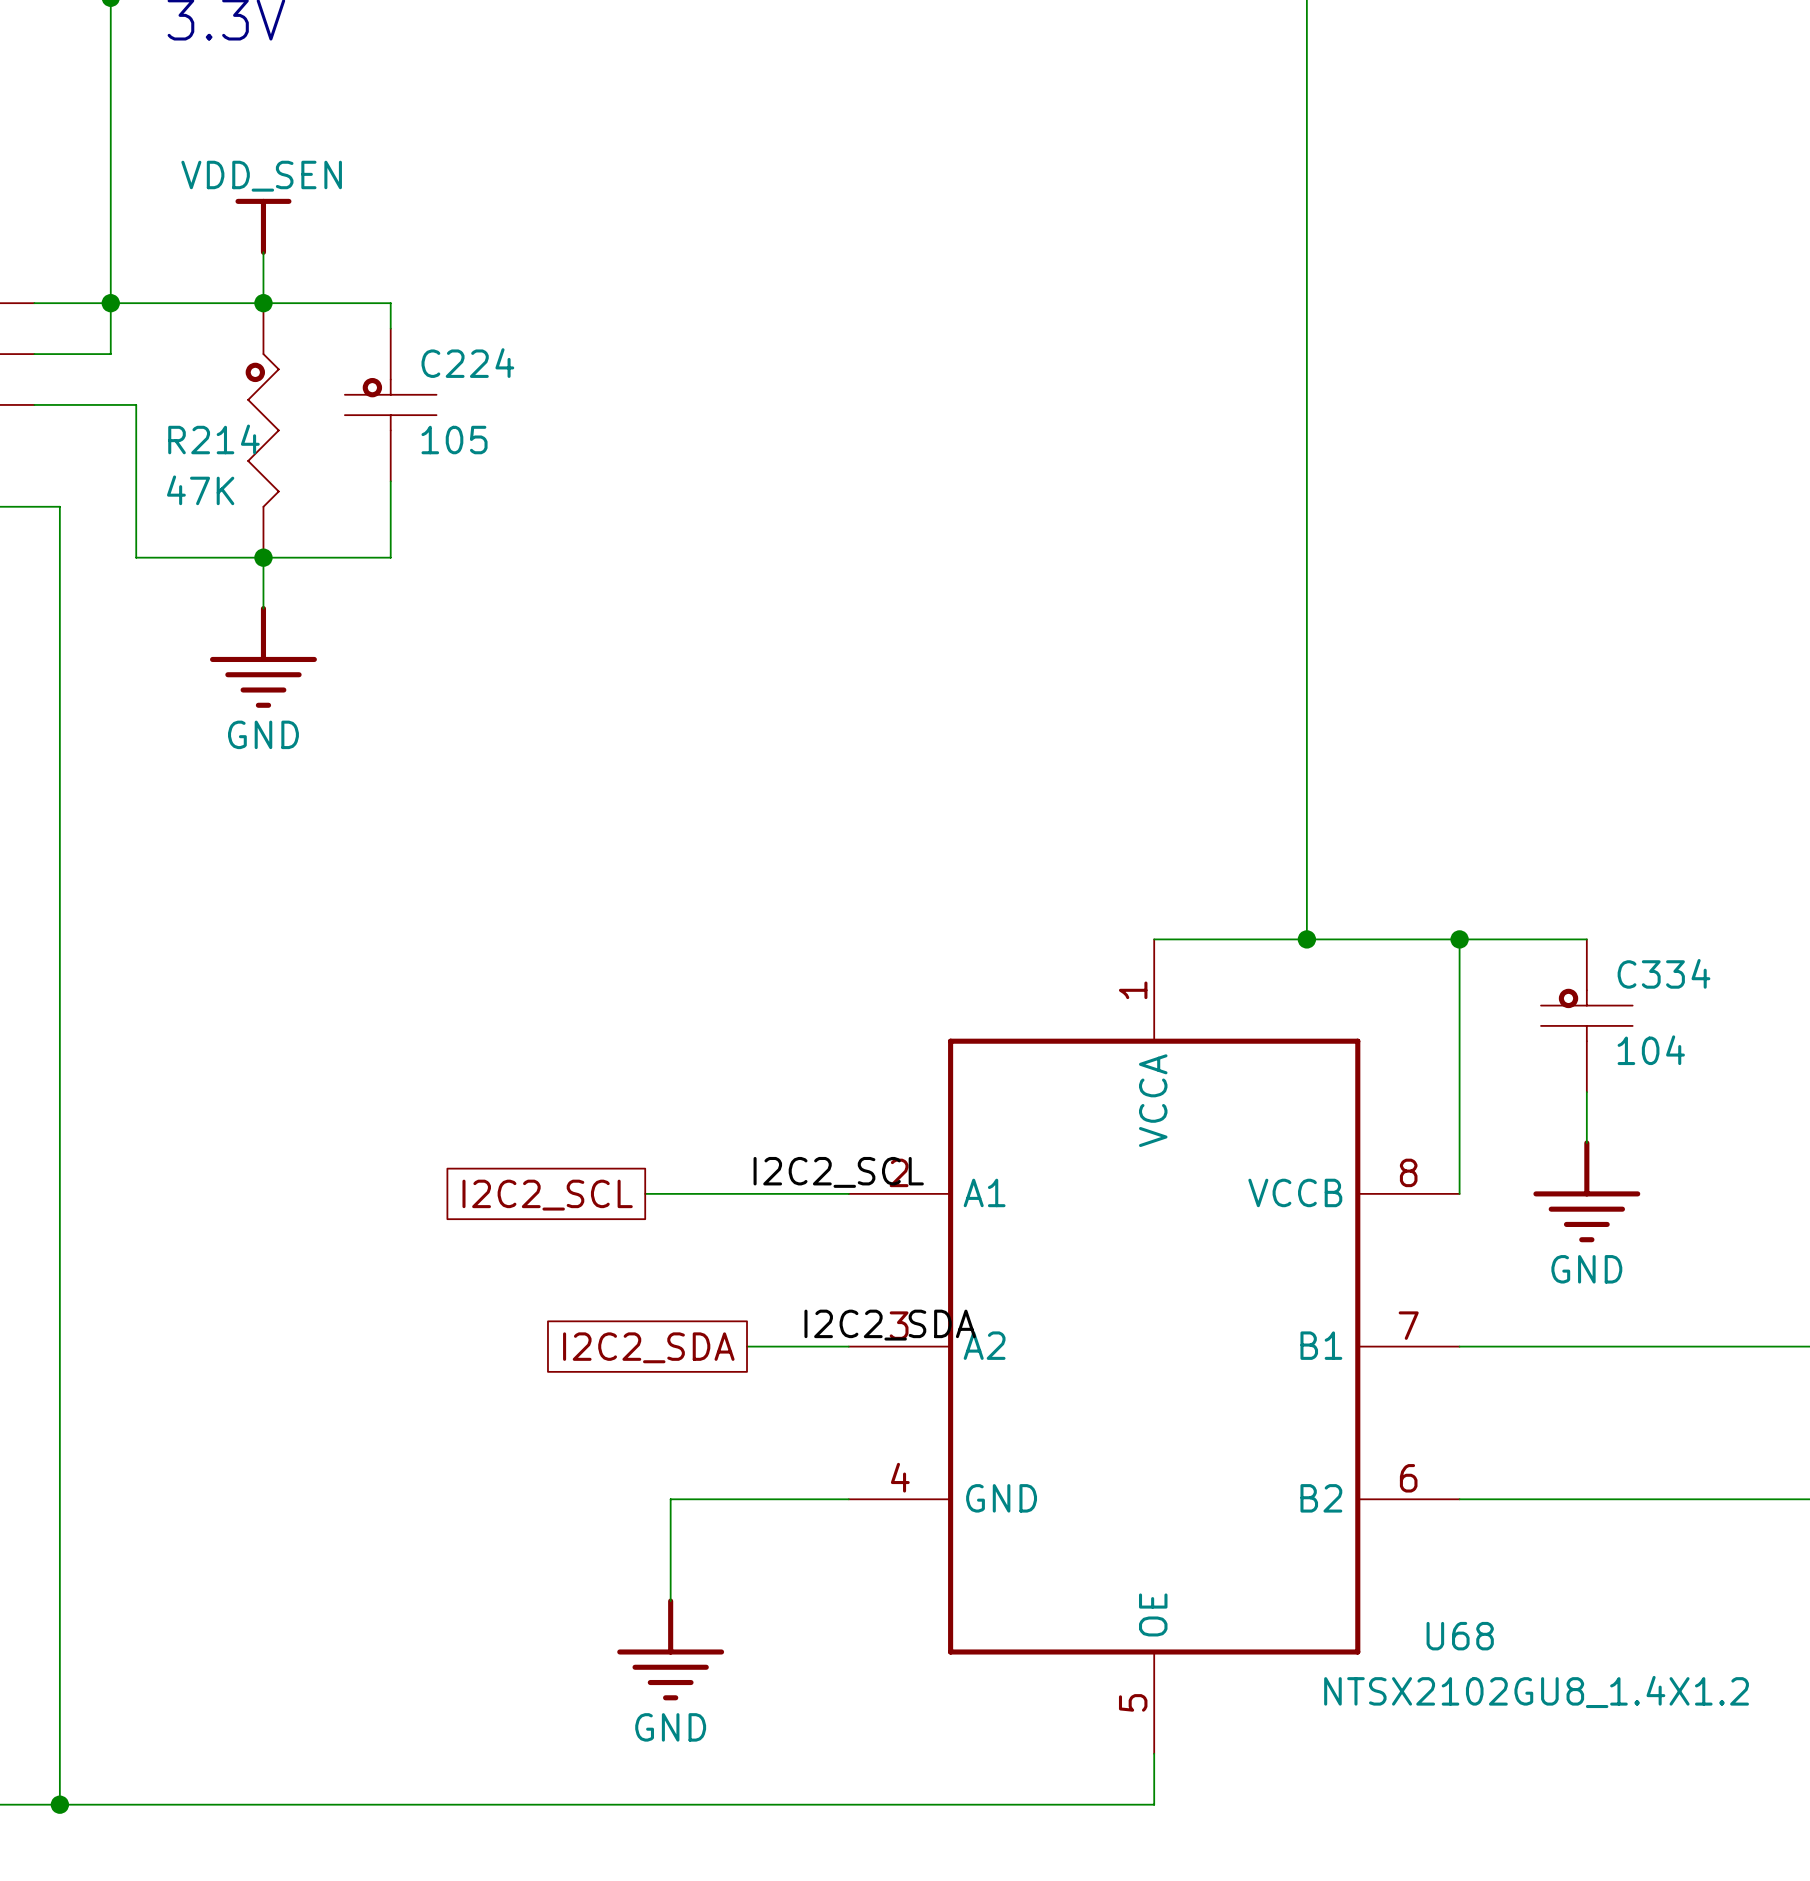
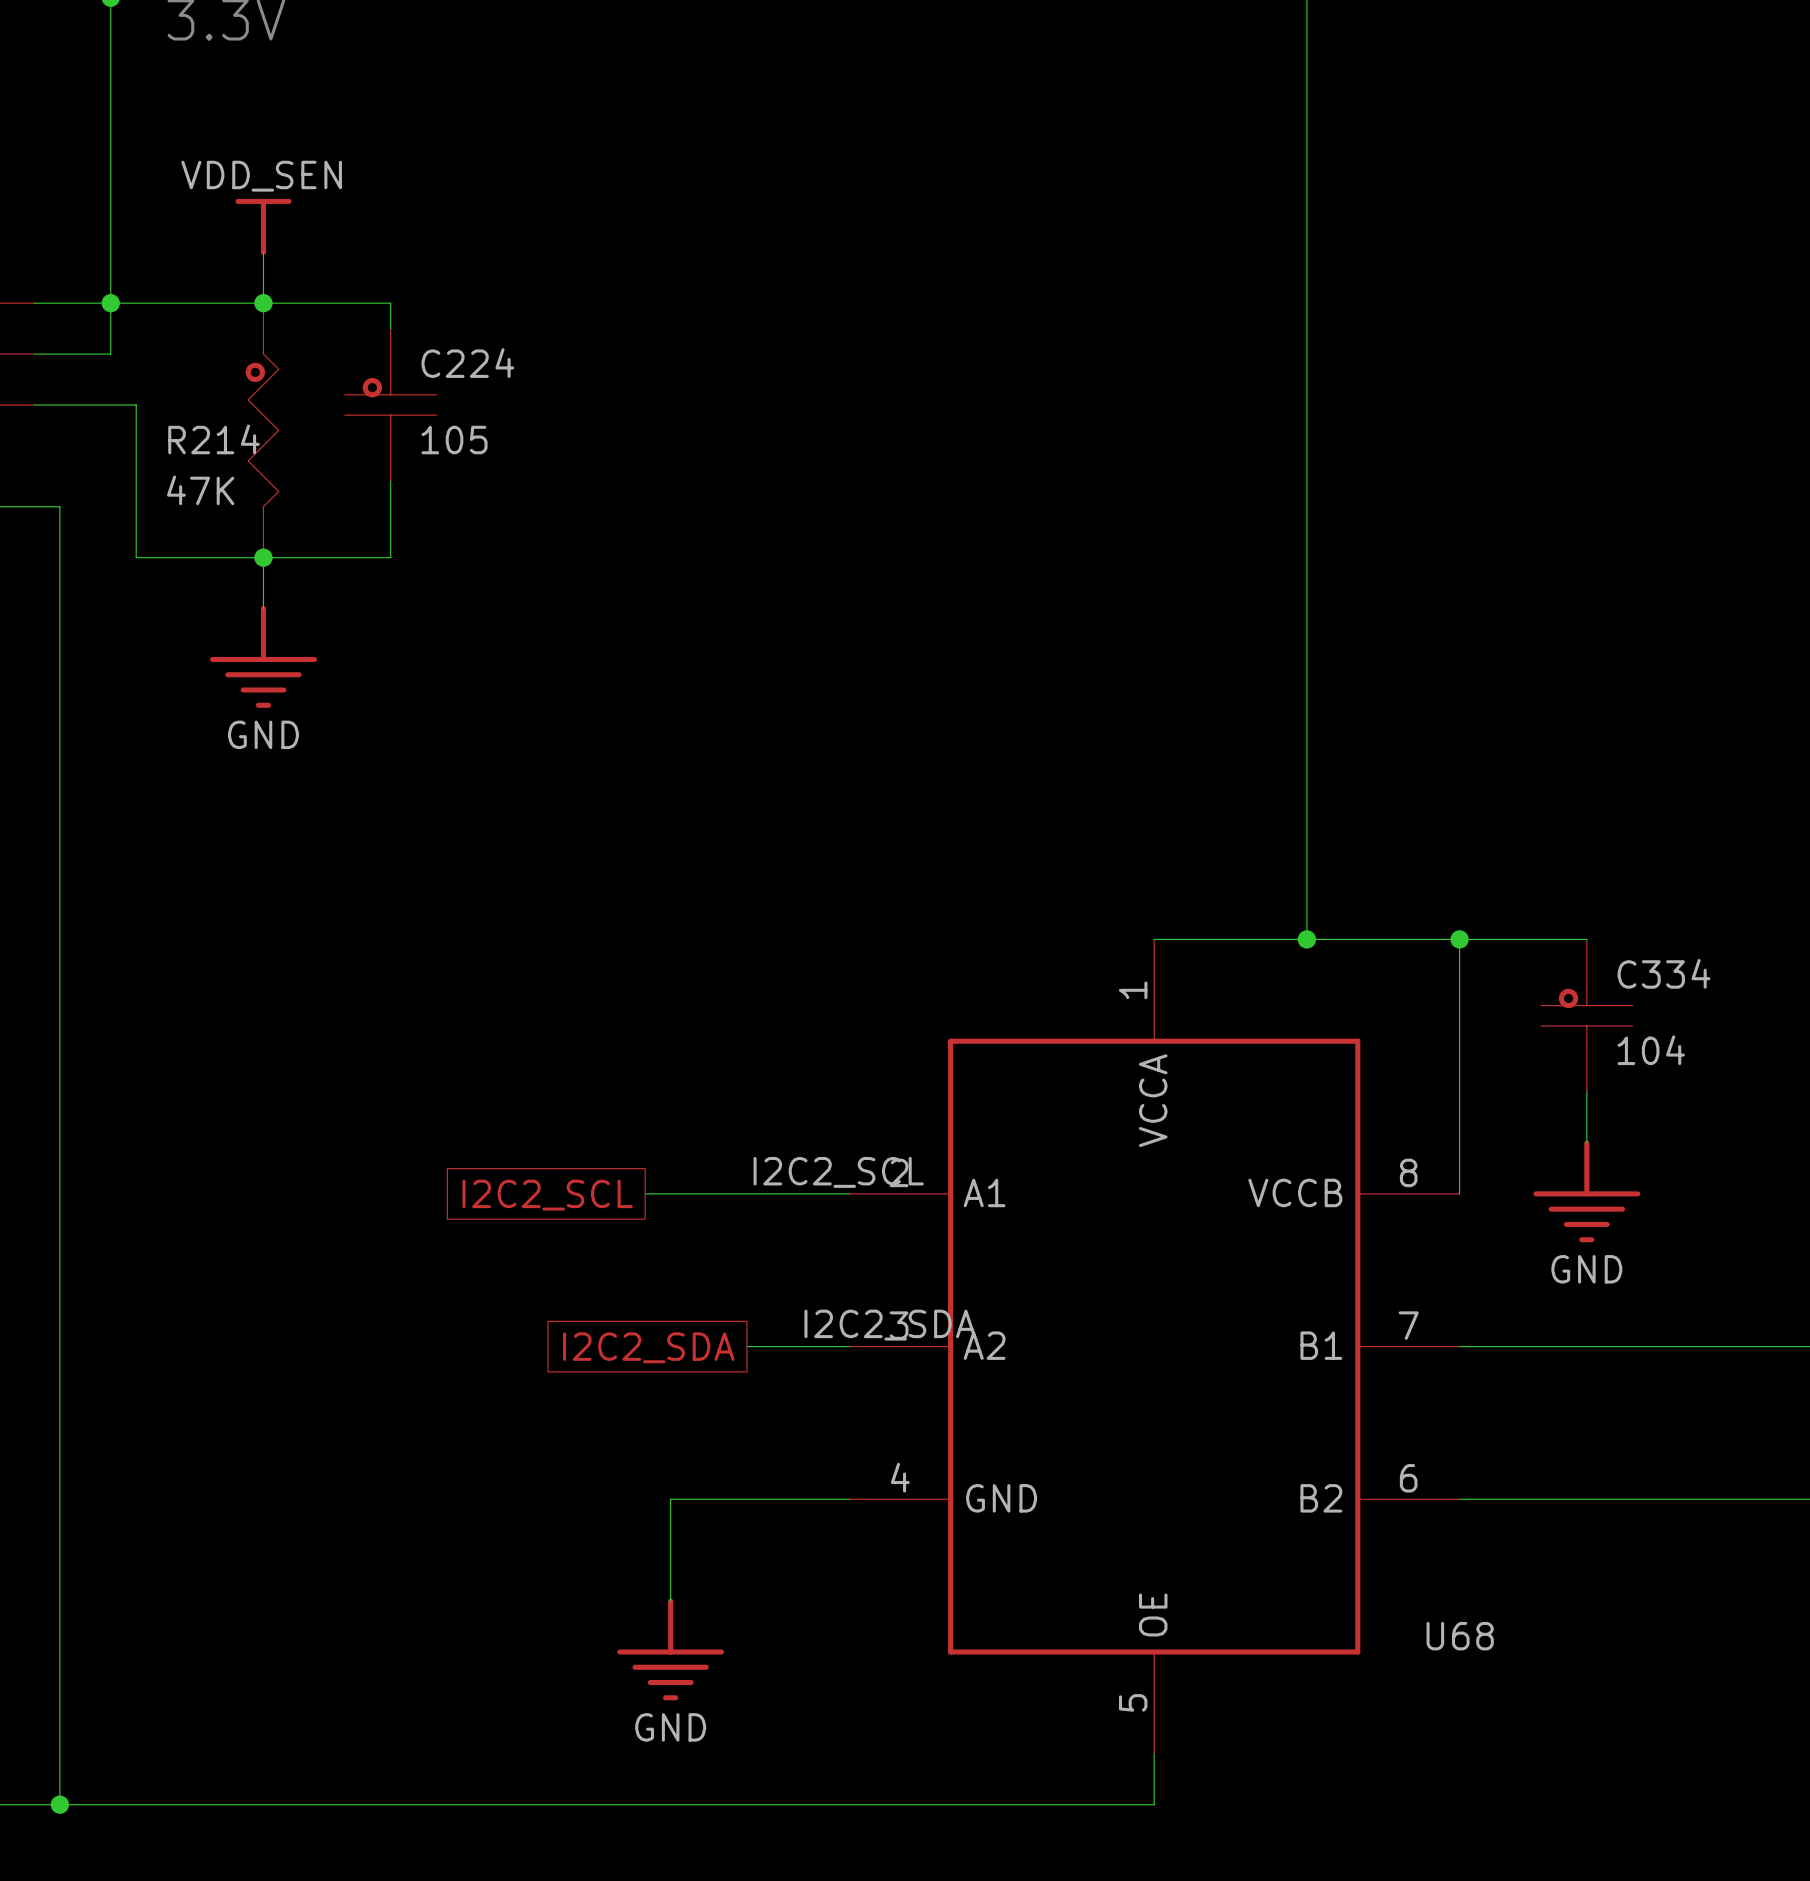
U68 value: NTSX2102GU8_1.4X1.2 (1536, 1691) -> none

